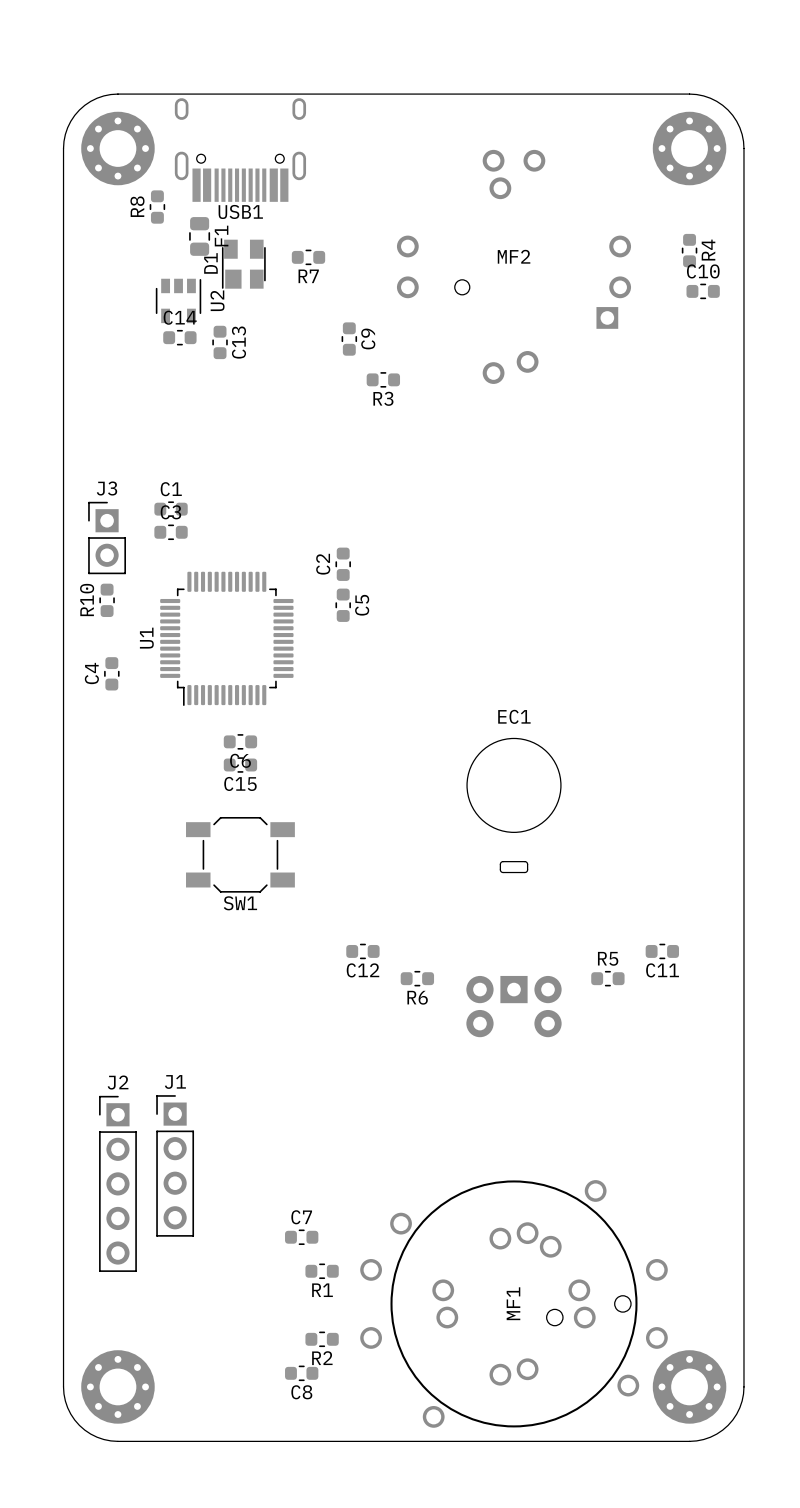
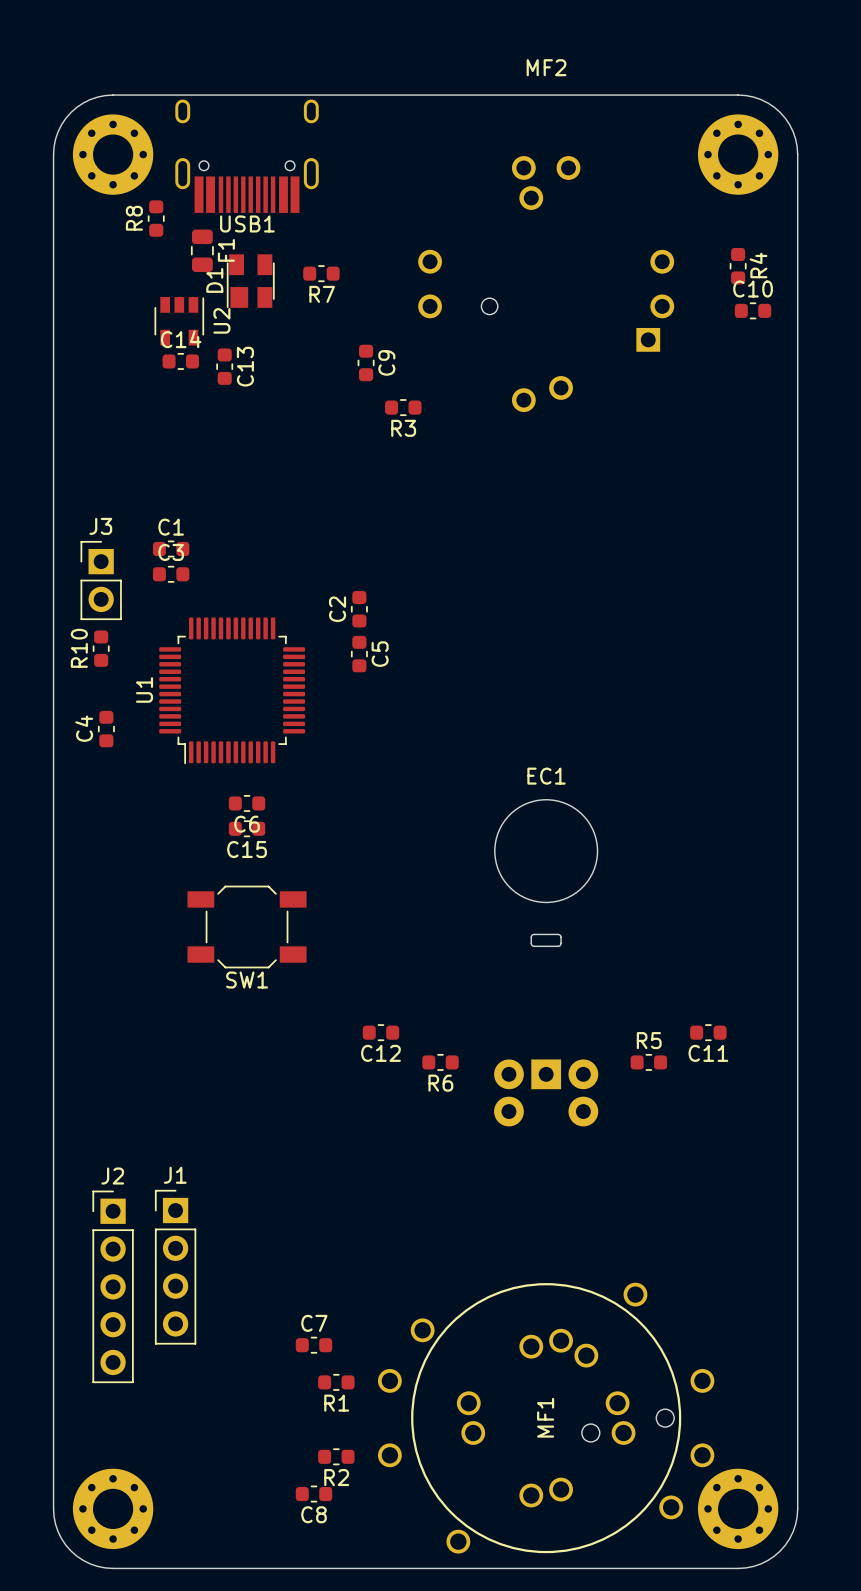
MF2 name position: MF2 (514, 256) -> MF2 (546, 67)

